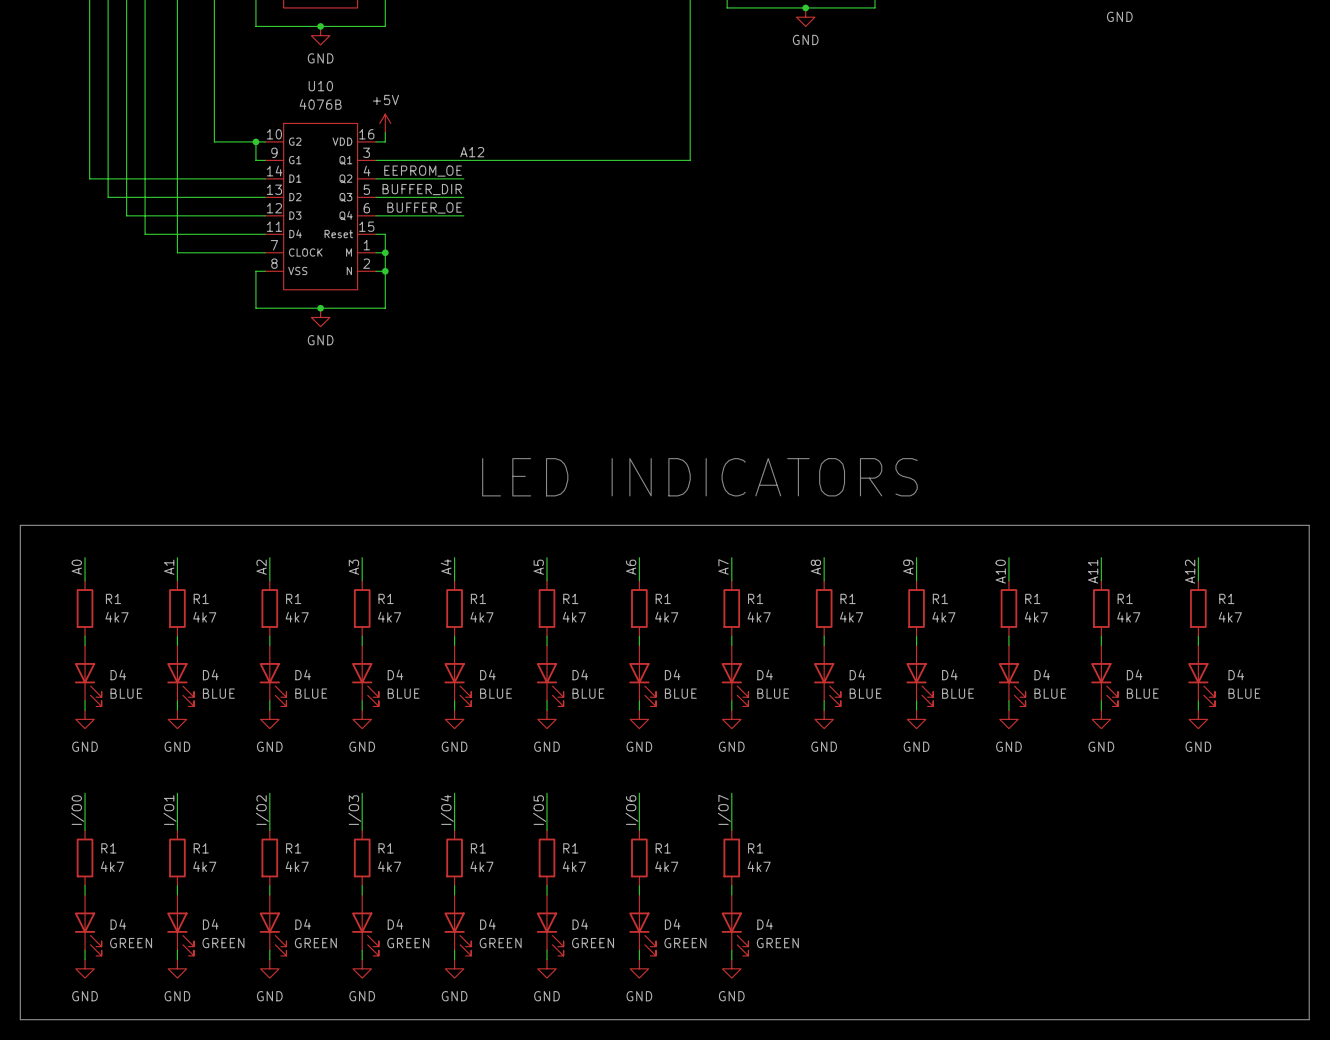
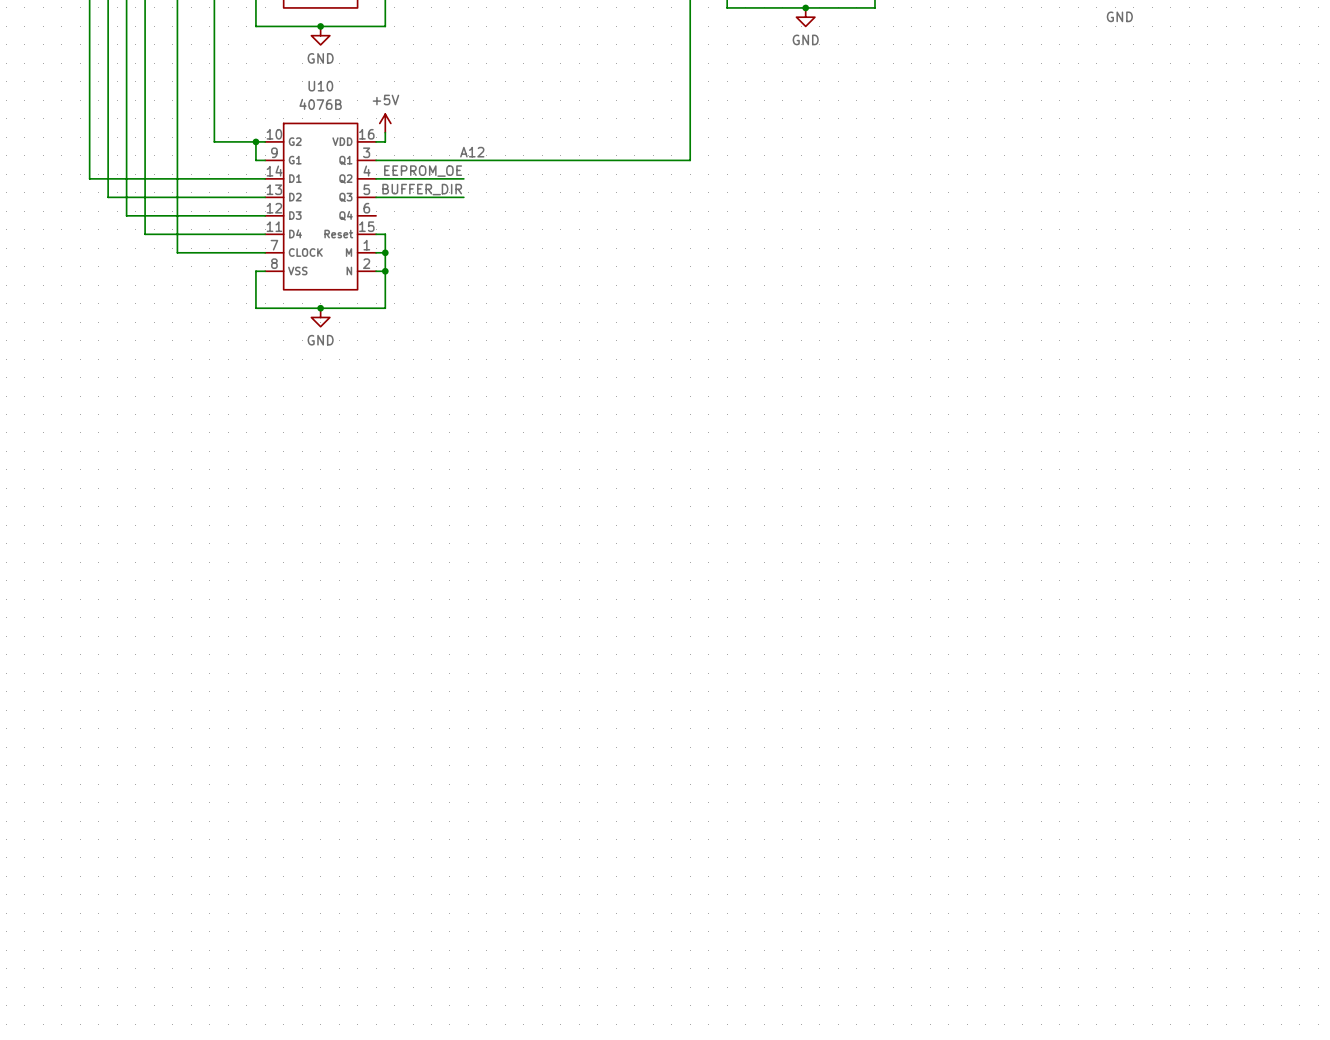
label: BUFFER_OE (424, 208) -> none
wire: (376, 215) (463, 215) -> none
text: LED INDICATORS (699, 477) -> none
line: (20, 525) (1309, 525) (1309, 1019) (20, 1019) (20, 525) -> none
wire: (85, 557) (85, 580) -> none
wire: (177, 557) (177, 580) -> none
wire: (269, 557) (269, 580) -> none
wire: (362, 557) (362, 580) -> none
wire: (454, 557) (454, 580) -> none
wire: (546, 557) (546, 580) -> none
wire: (639, 557) (639, 580) -> none
wire: (731, 557) (731, 580) -> none
wire: (824, 557) (824, 580) -> none
wire: (916, 557) (916, 580) -> none
wire: (1008, 557) (1008, 580) -> none
wire: (1101, 557) (1101, 580) -> none
wire: (1198, 557) (1198, 580) -> none
label: A0 (76, 567) -> none
label: A1 (169, 567) -> none
label: A2 (261, 567) -> none
label: A3 (353, 567) -> none
label: A4 (446, 567) -> none
label: A5 (538, 567) -> none
label: A6 (631, 567) -> none
label: A7 (723, 567) -> none
label: A8 (815, 567) -> none
label: A9 (908, 567) -> none
label: A10 (1000, 571) -> none
label: A11 (1093, 571) -> none
label: A12 (1190, 571) -> none
R1: 4k7 (85, 608) -> none
R1: 4k7 (177, 608) -> none
R1: 4k7 (269, 608) -> none
R1: 4k7 (362, 608) -> none
R1: 4k7 (454, 608) -> none
R1: 4k7 (546, 608) -> none
R1: 4k7 (639, 608) -> none
R1: 4k7 (731, 608) -> none
R1: 4k7 (824, 608) -> none
R1: 4k7 (916, 608) -> none
R1: 4k7 (1008, 608) -> none
R1: 4k7 (1101, 608) -> none
R1: 4k7 (1198, 608) -> none
wire: (85, 636) (85, 645) -> none
wire: (177, 636) (177, 645) -> none
wire: (269, 636) (269, 645) -> none
wire: (362, 636) (362, 645) -> none
wire: (454, 636) (454, 645) -> none
wire: (546, 636) (546, 645) -> none
wire: (639, 636) (639, 645) -> none
wire: (731, 636) (731, 645) -> none
wire: (824, 636) (824, 645) -> none
wire: (916, 636) (916, 645) -> none
wire: (1008, 636) (1008, 645) -> none
wire: (1101, 636) (1101, 645) -> none
wire: (1198, 636) (1198, 645) -> none
D4: BLUE (88, 675) -> none
D4: BLUE (180, 675) -> none
D4: BLUE (273, 675) -> none
D4: BLUE (365, 675) -> none
D4: BLUE (457, 675) -> none
D4: BLUE (550, 675) -> none
D4: BLUE (642, 675) -> none
D4: BLUE (735, 675) -> none
D4: BLUE (827, 675) -> none
D4: BLUE (919, 675) -> none
D4: BLUE (1012, 675) -> none
D4: BLUE (1104, 675) -> none
D4: BLUE (1201, 675) -> none
wire: (85, 700) (85, 710) -> none
wire: (177, 700) (177, 710) -> none
wire: (269, 700) (269, 710) -> none
wire: (362, 700) (362, 710) -> none
wire: (454, 700) (454, 710) -> none
wire: (546, 700) (546, 710) -> none
wire: (639, 700) (639, 710) -> none
wire: (731, 700) (731, 710) -> none
wire: (824, 700) (824, 710) -> none
wire: (916, 700) (916, 710) -> none
wire: (1008, 700) (1008, 710) -> none
wire: (1101, 700) (1101, 710) -> none
wire: (1198, 700) (1198, 710) -> none
power symbol: GND (85, 719) -> none
power symbol: GND (177, 719) -> none
power symbol: GND (269, 719) -> none
power symbol: GND (362, 719) -> none
power symbol: GND (454, 719) -> none
power symbol: GND (546, 719) -> none
power symbol: GND (639, 719) -> none
power symbol: GND (731, 719) -> none
power symbol: GND (824, 719) -> none
power symbol: GND (916, 719) -> none
power symbol: GND (1008, 719) -> none
power symbol: GND (1101, 719) -> none
power symbol: GND (1198, 719) -> none
wire: (85, 793) (85, 830) -> none
wire: (177, 793) (177, 830) -> none
wire: (269, 793) (269, 830) -> none
wire: (362, 793) (362, 830) -> none
wire: (454, 793) (454, 830) -> none
wire: (546, 793) (546, 830) -> none
wire: (639, 793) (639, 830) -> none
wire: (731, 793) (731, 830) -> none
label: I/O4 (447, 809) -> none
label: I/O7 (724, 809) -> none
label: I/O0 (77, 810) -> none
label: I/O1 (170, 810) -> none
label: I/O2 (262, 810) -> none
label: I/O3 (354, 810) -> none
label: I/O5 (539, 810) -> none
label: I/O6 (632, 810) -> none
R1: 4k7 (85, 857) -> none
R1: 4k7 (177, 857) -> none
R1: 4k7 (269, 857) -> none
R1: 4k7 (362, 857) -> none
R1: 4k7 (454, 857) -> none
R1: 4k7 (546, 857) -> none
R1: 4k7 (639, 857) -> none
R1: 4k7 (731, 857) -> none
wire: (85, 885) (85, 894) -> none
wire: (177, 885) (177, 894) -> none
wire: (269, 885) (269, 894) -> none
wire: (362, 885) (362, 894) -> none
wire: (454, 885) (454, 894) -> none
wire: (546, 885) (546, 894) -> none
wire: (639, 885) (639, 894) -> none
wire: (731, 885) (731, 894) -> none
D4: GREEN (88, 925) -> none
D4: GREEN (180, 925) -> none
D4: GREEN (273, 925) -> none
D4: GREEN (365, 925) -> none
D4: GREEN (457, 925) -> none
D4: GREEN (550, 925) -> none
D4: GREEN (642, 925) -> none
D4: GREEN (735, 925) -> none
wire: (85, 950) (85, 959) -> none
wire: (177, 950) (177, 959) -> none
wire: (269, 950) (269, 959) -> none
wire: (362, 950) (362, 959) -> none
wire: (454, 950) (454, 959) -> none
wire: (546, 950) (546, 959) -> none
wire: (639, 950) (639, 959) -> none
wire: (731, 950) (731, 959) -> none
power symbol: GND (85, 968) -> none
power symbol: GND (177, 968) -> none
power symbol: GND (269, 968) -> none
power symbol: GND (362, 968) -> none
power symbol: GND (454, 968) -> none
power symbol: GND (546, 968) -> none
power symbol: GND (639, 968) -> none
power symbol: GND (731, 968) -> none

